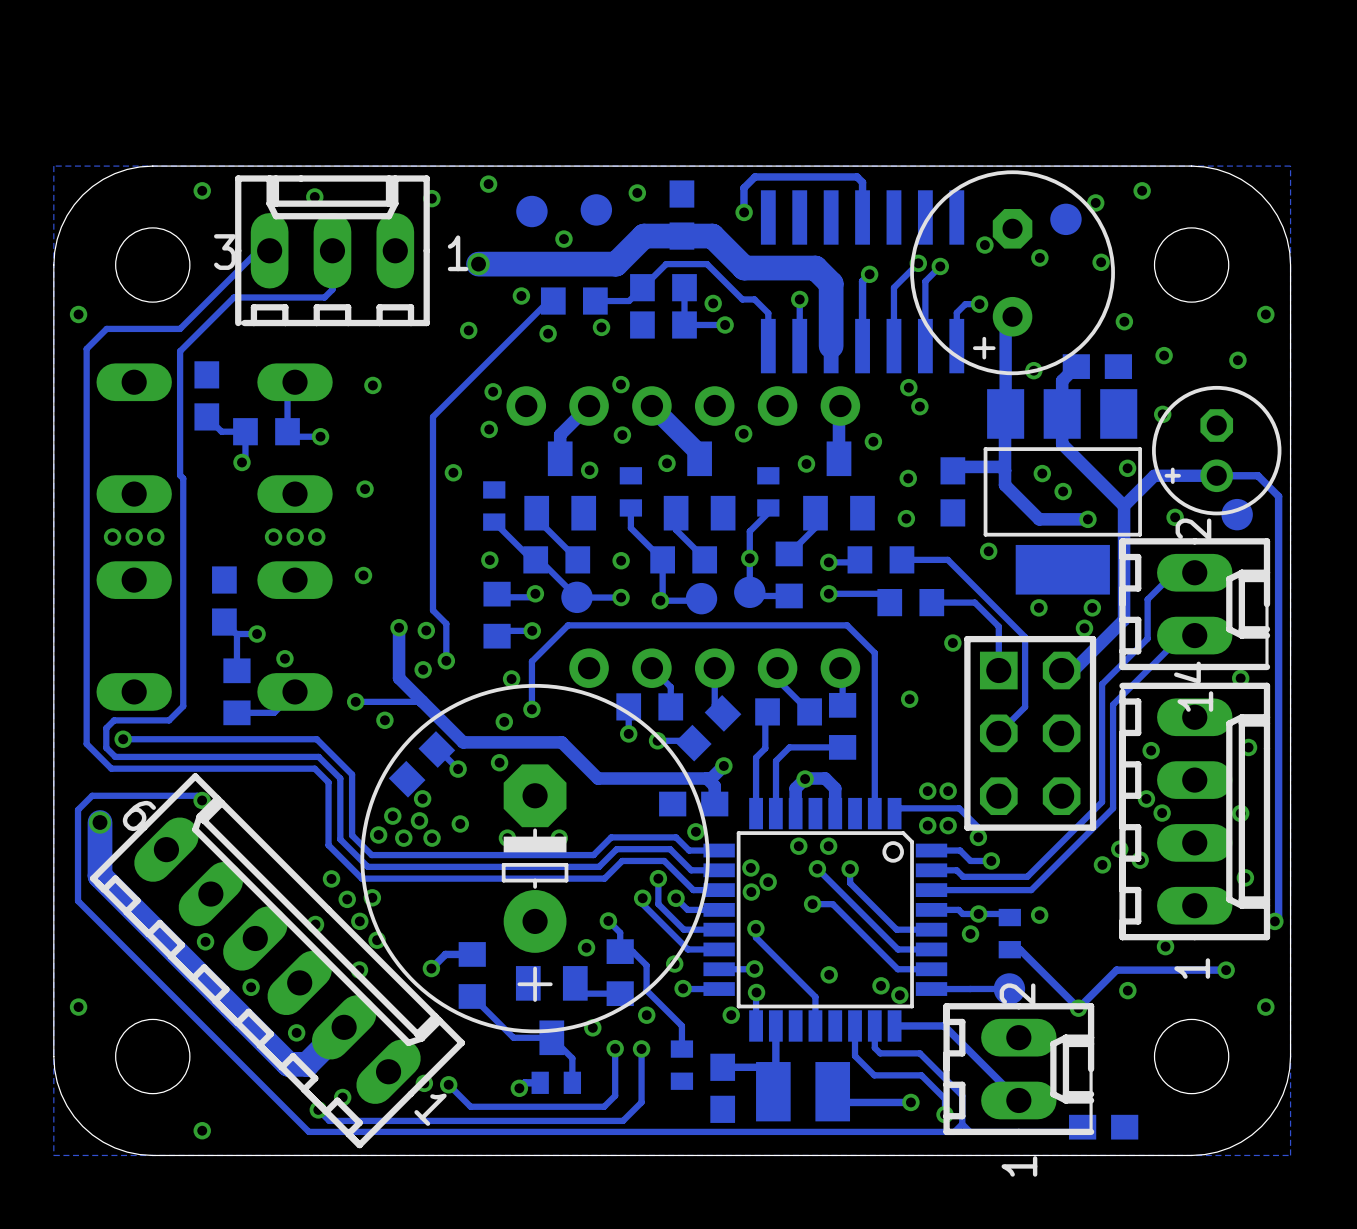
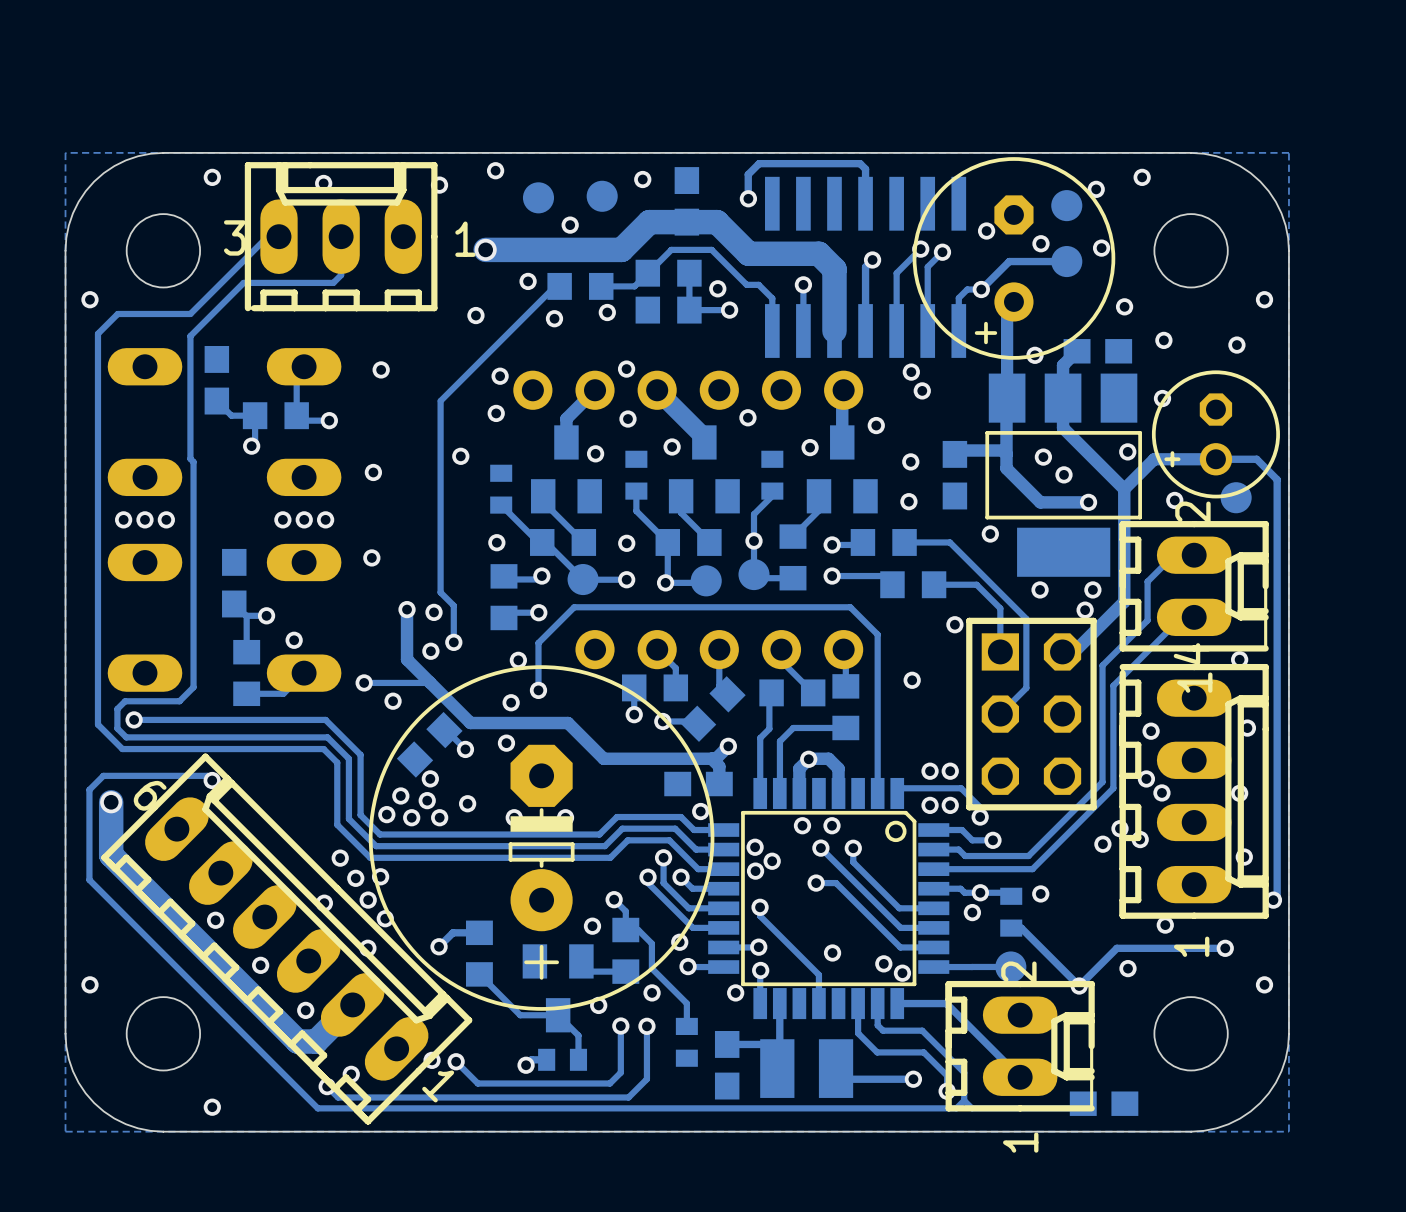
track: none -> (1066, 261) (1009, 261) (981, 289)
part: none -> (1066, 261)

